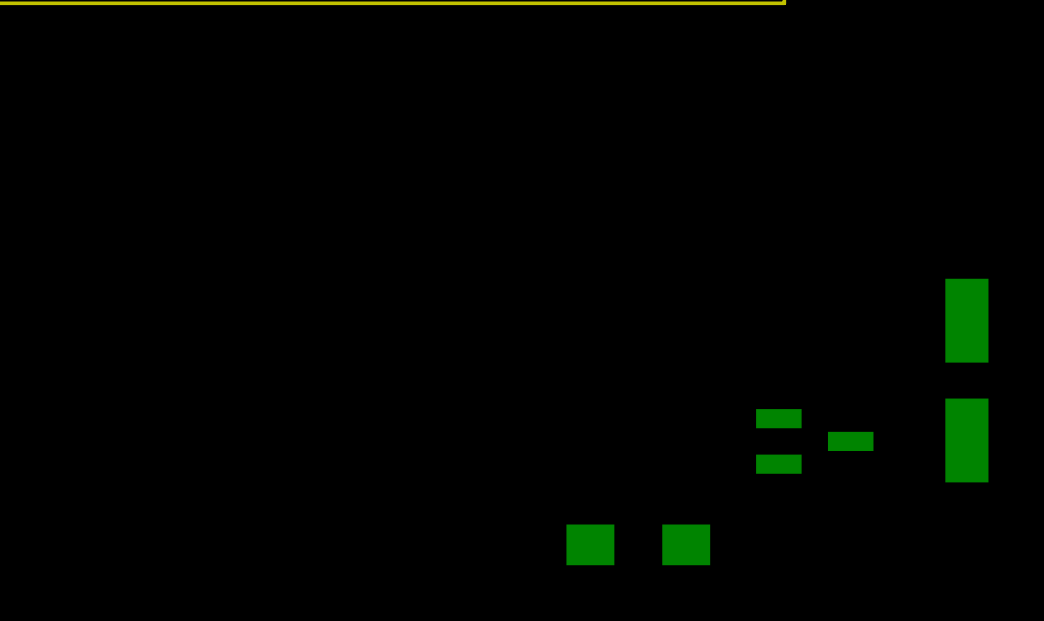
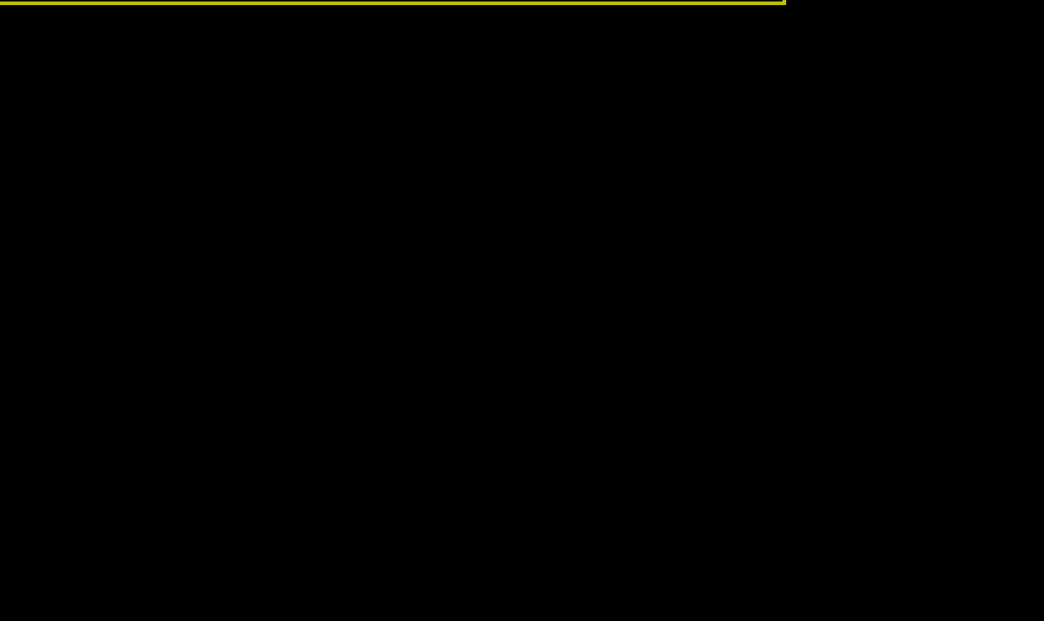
part: (966, 380) -> none
part: (814, 441) -> none
part: (638, 544) -> none

